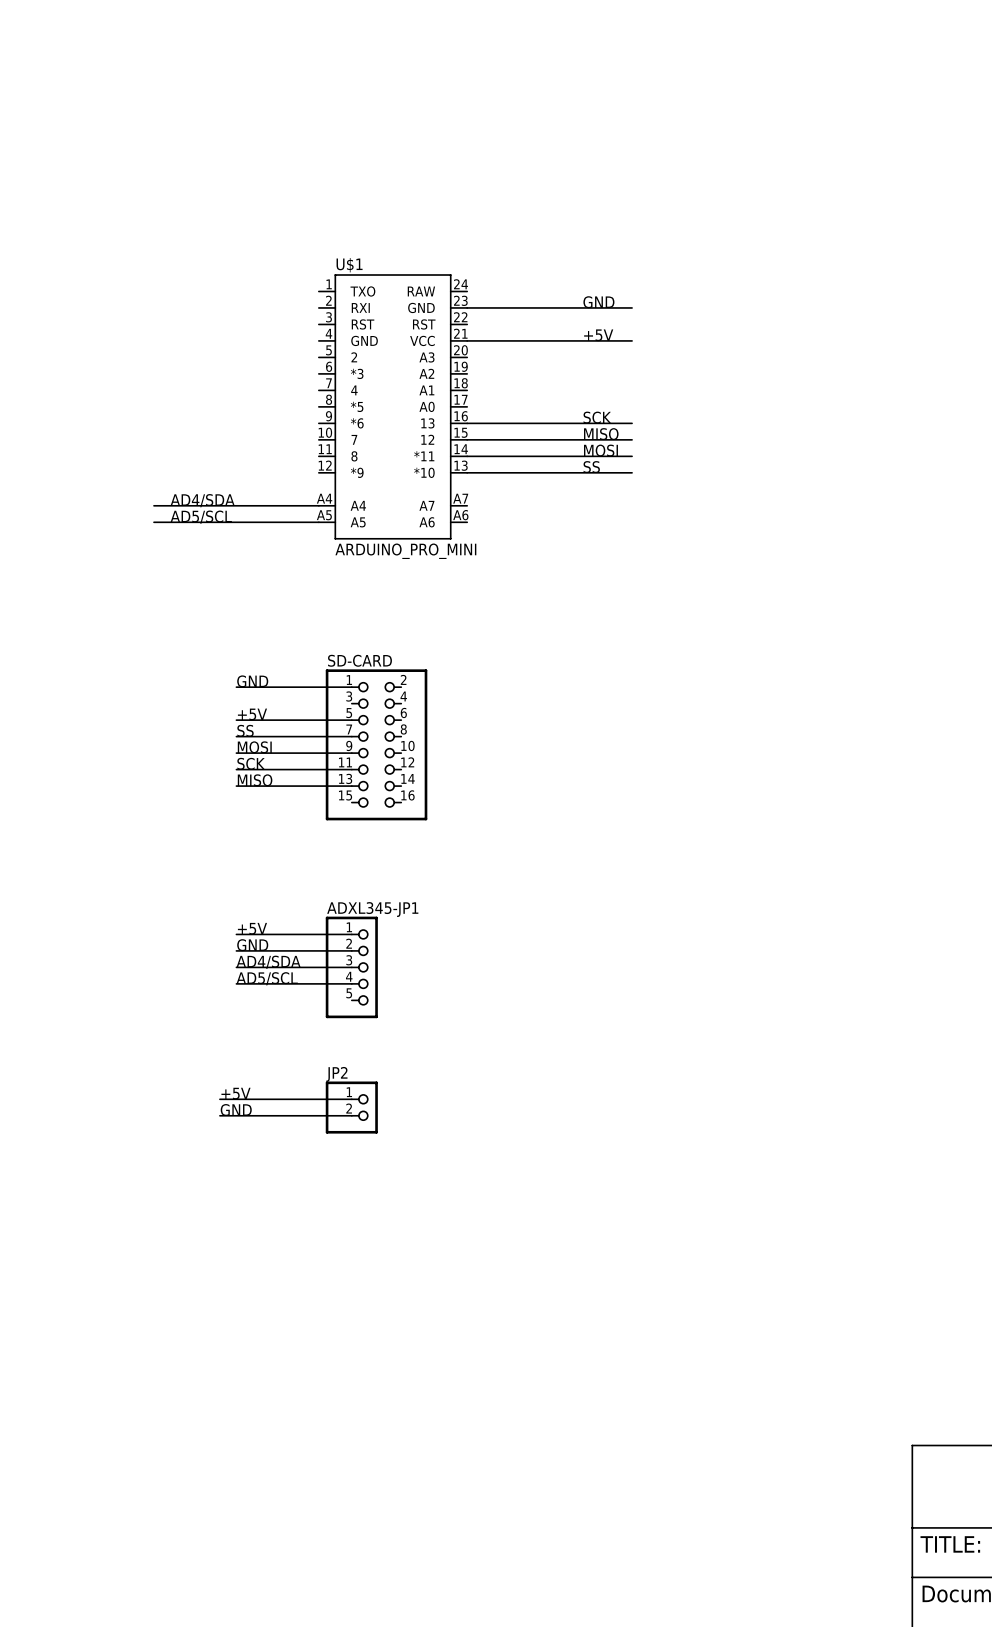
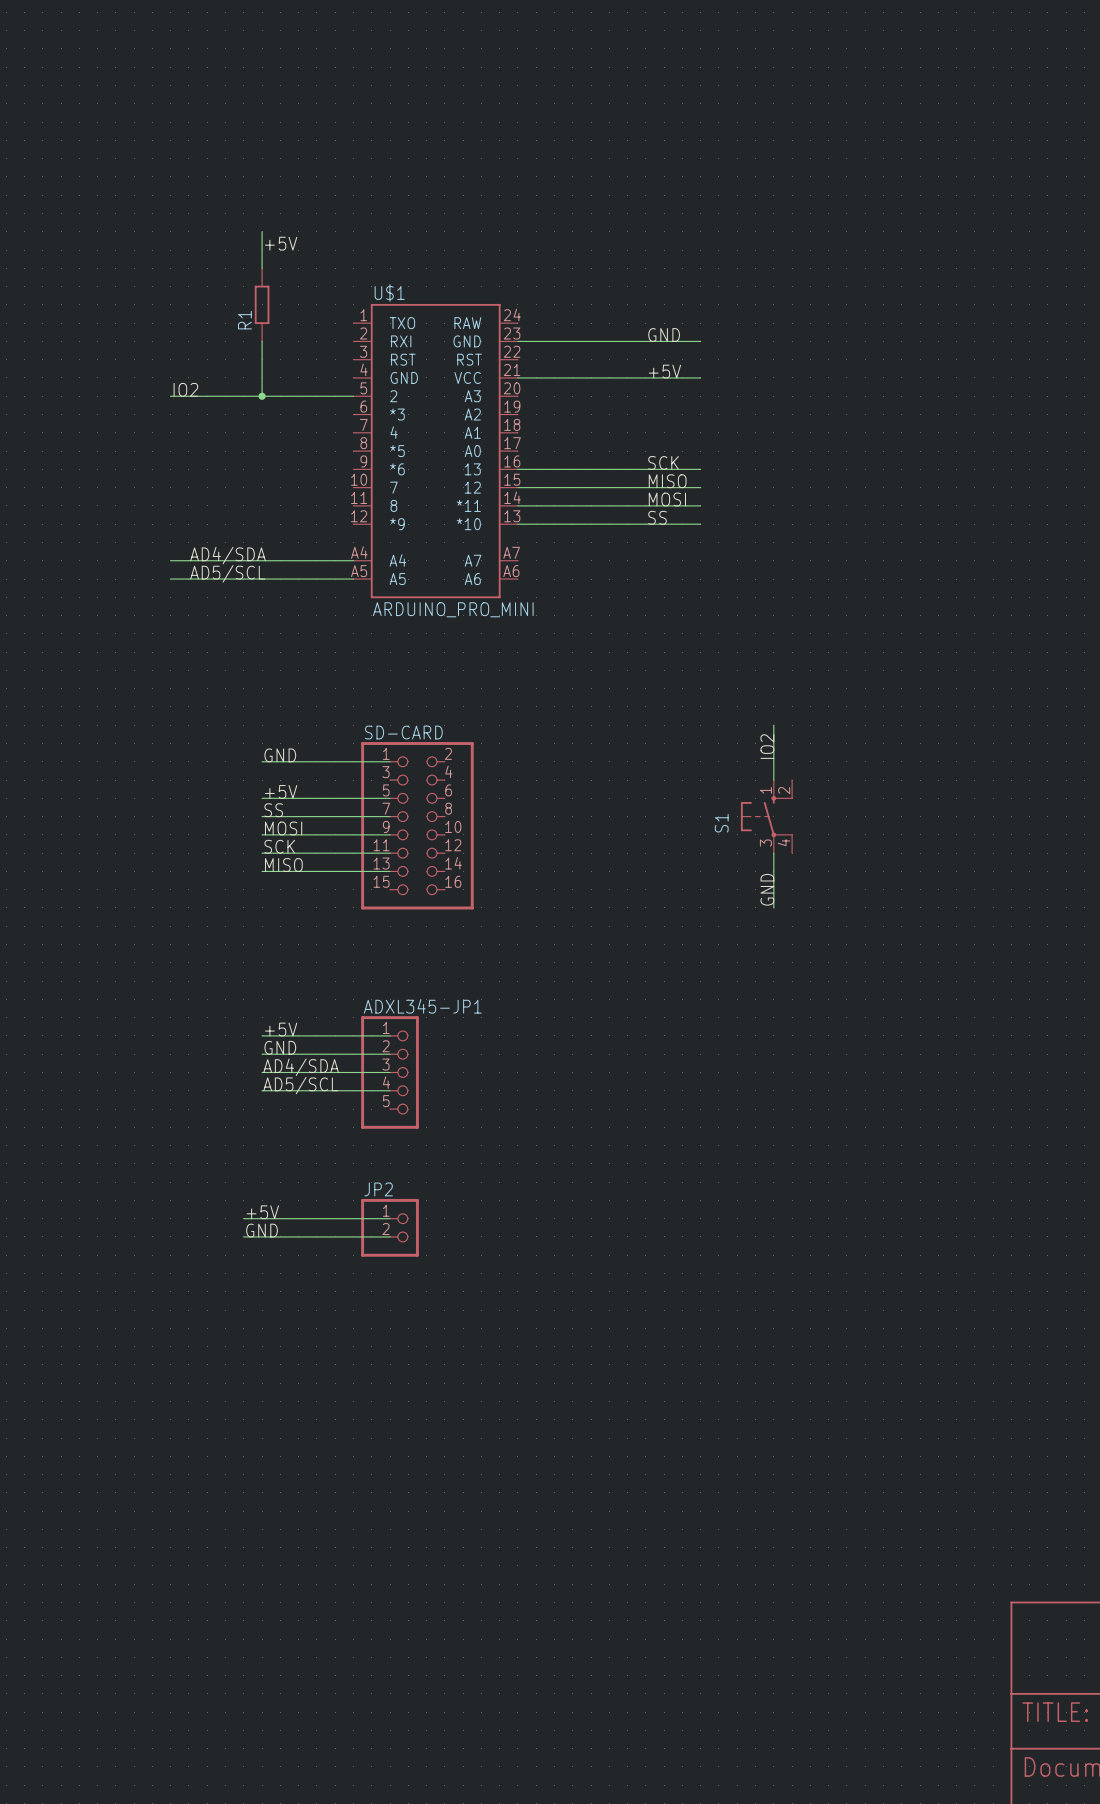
wire: none -> (262, 231) (262, 268)
label: none -> +5V (281, 243)
R1: none -> (262, 304)
wire: none -> (262, 341) (262, 396)
label: none -> IO2 (185, 389)
wire: none -> (170, 396) (353, 396)
junction: none -> (262, 396)
wire: none -> (773, 725) (773, 780)
label: none -> IO2 (767, 746)
S1: none -> (766, 816)
wire: none -> (773, 853) (773, 907)
label: none -> GND (767, 889)

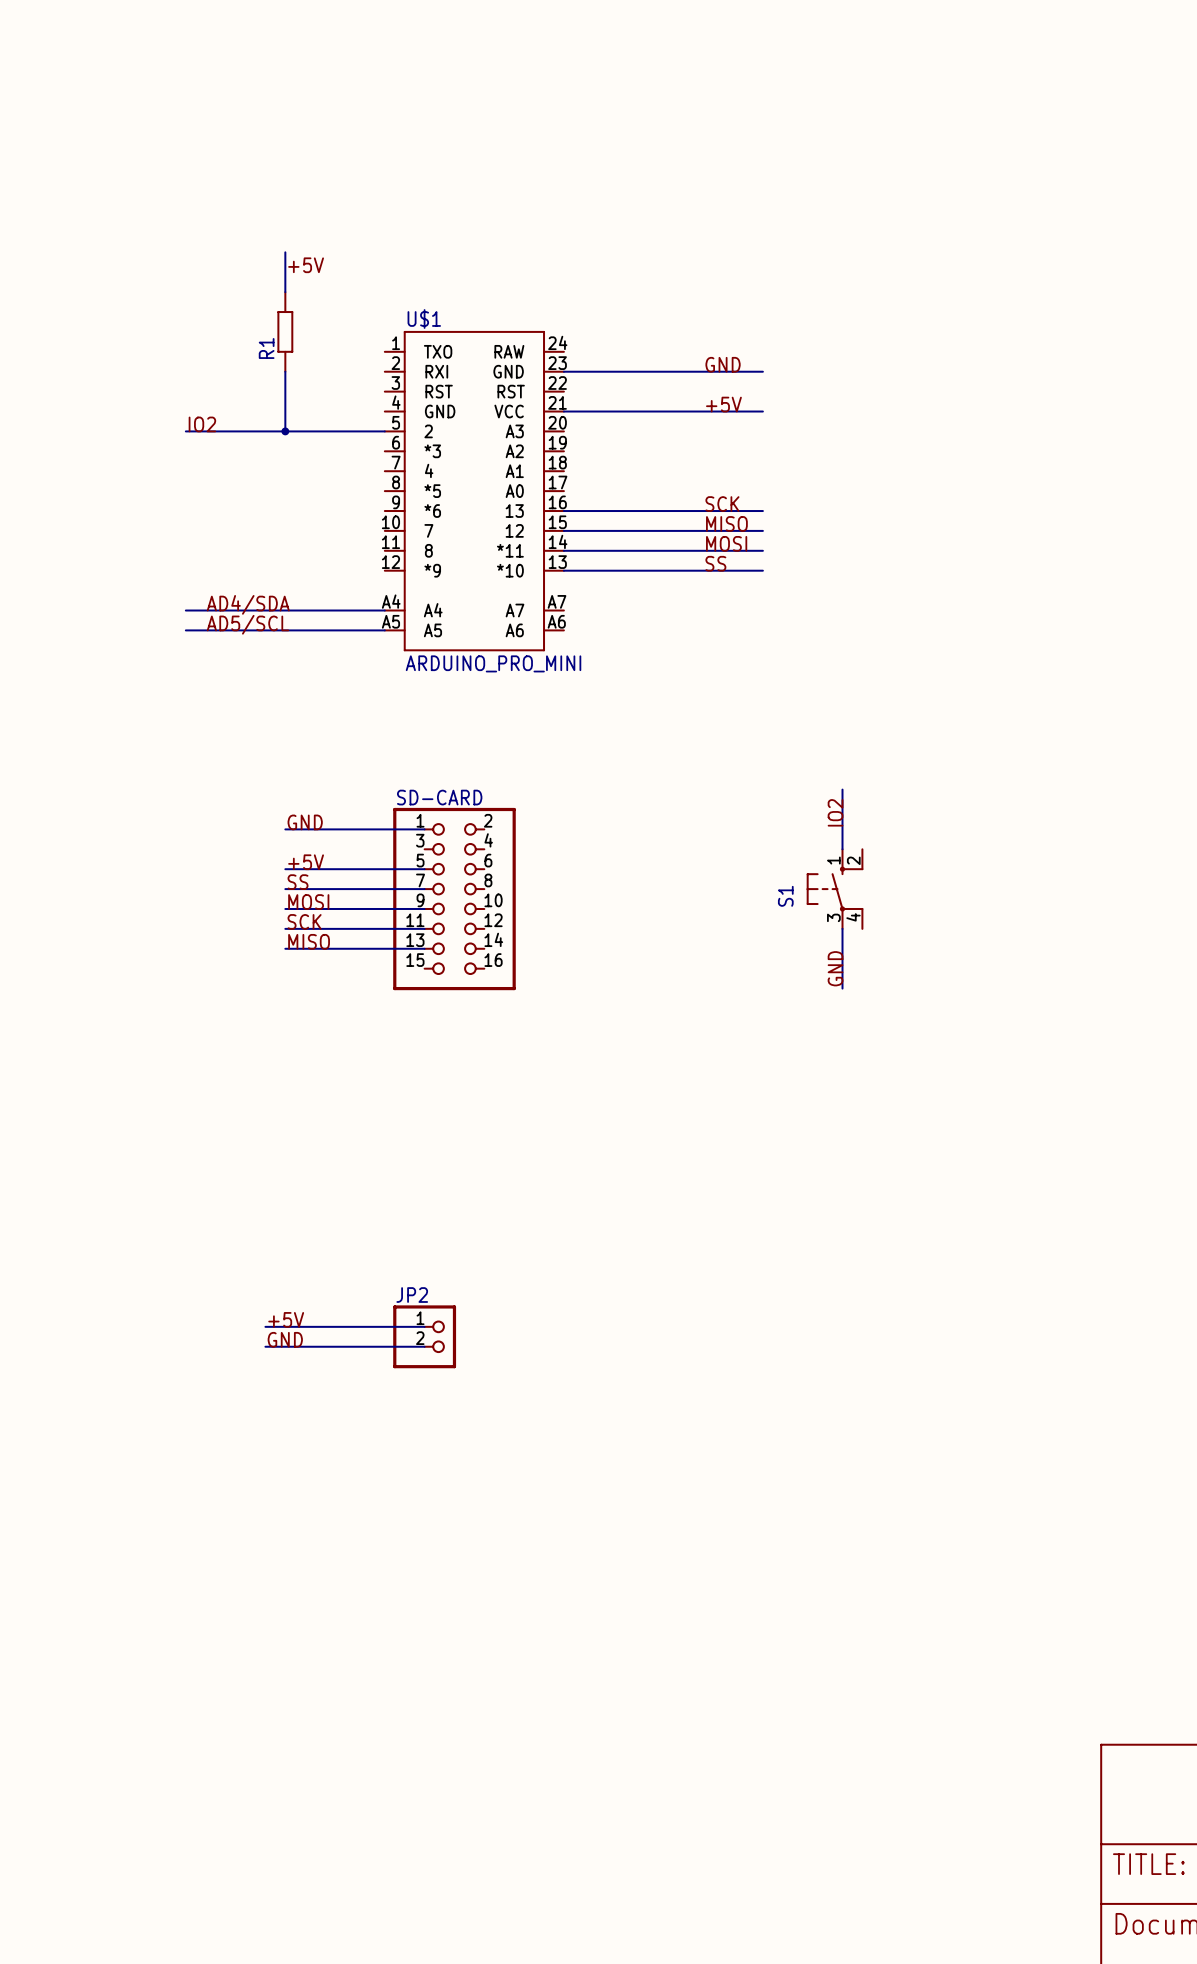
label: +5V (281, 1029) -> none
wire: (262, 1035) (390, 1035) -> none
label: GND (280, 1047) -> none
wire: (262, 1054) (390, 1054) -> none
label: AD4/SDA (301, 1067) -> none
wire: (262, 1072) (390, 1072) -> none
ADXL345-JP1: (390, 1072) -> none
label: AD5/SCL (300, 1085) -> none
wire: (262, 1090) (390, 1090) -> none

